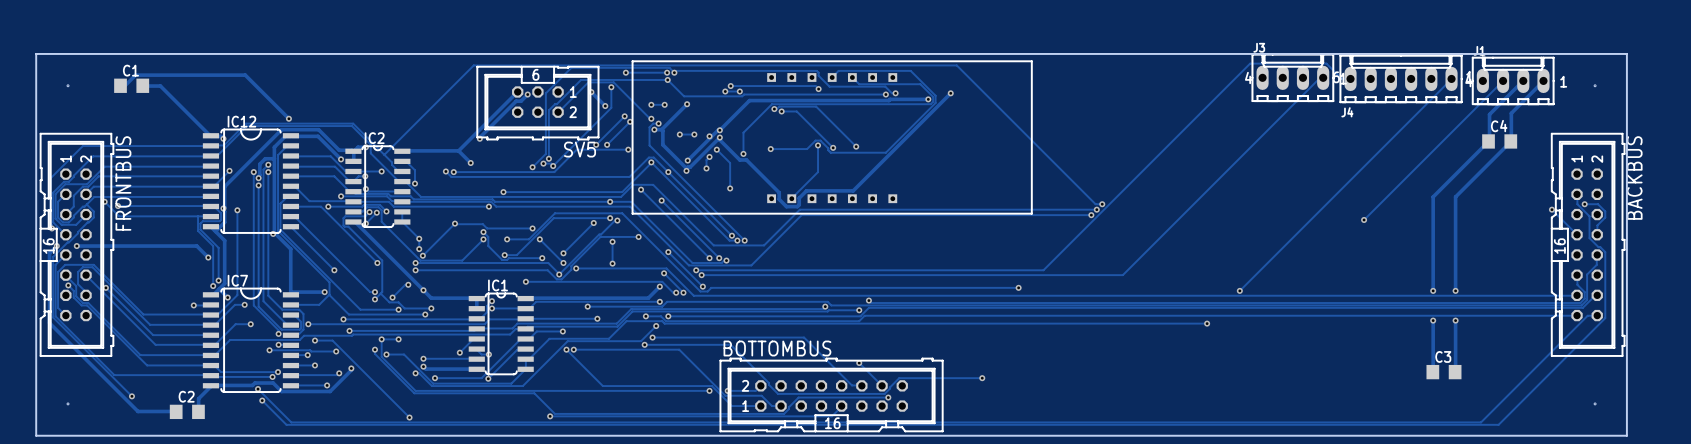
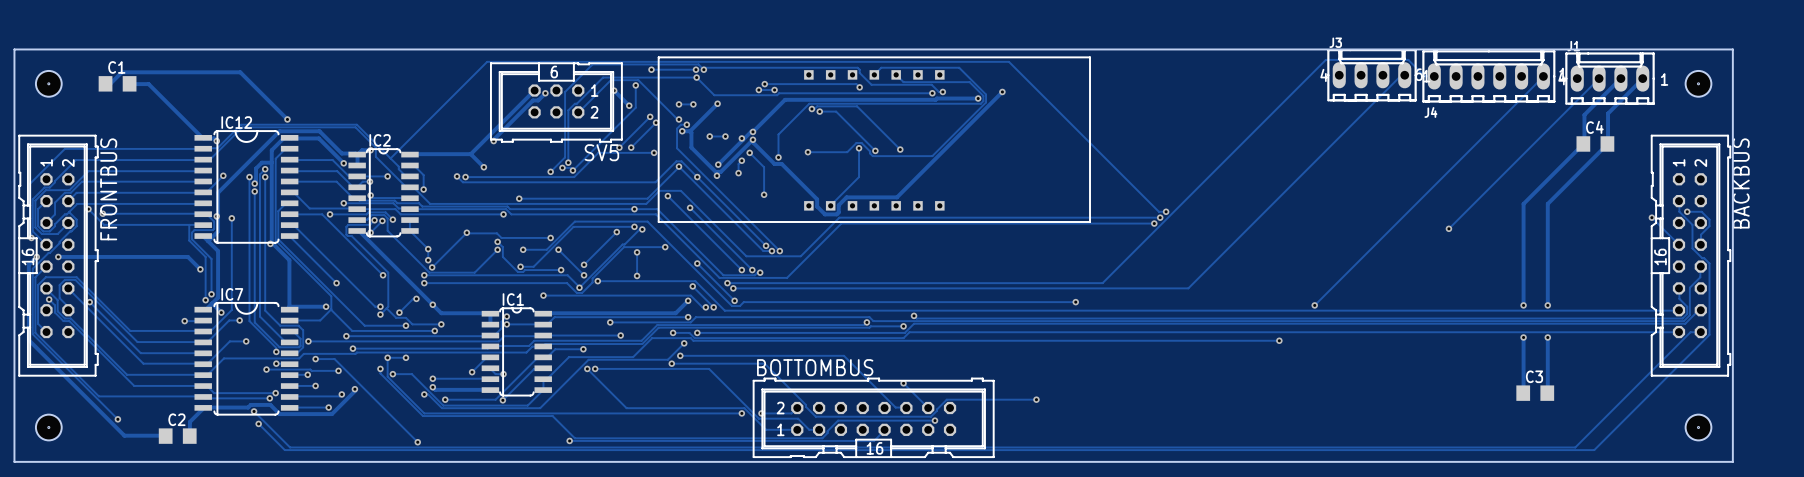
hole: none -> (48, 83)
hole: none -> (1698, 83)
hole: none -> (48, 427)
hole: none -> (1698, 427)

